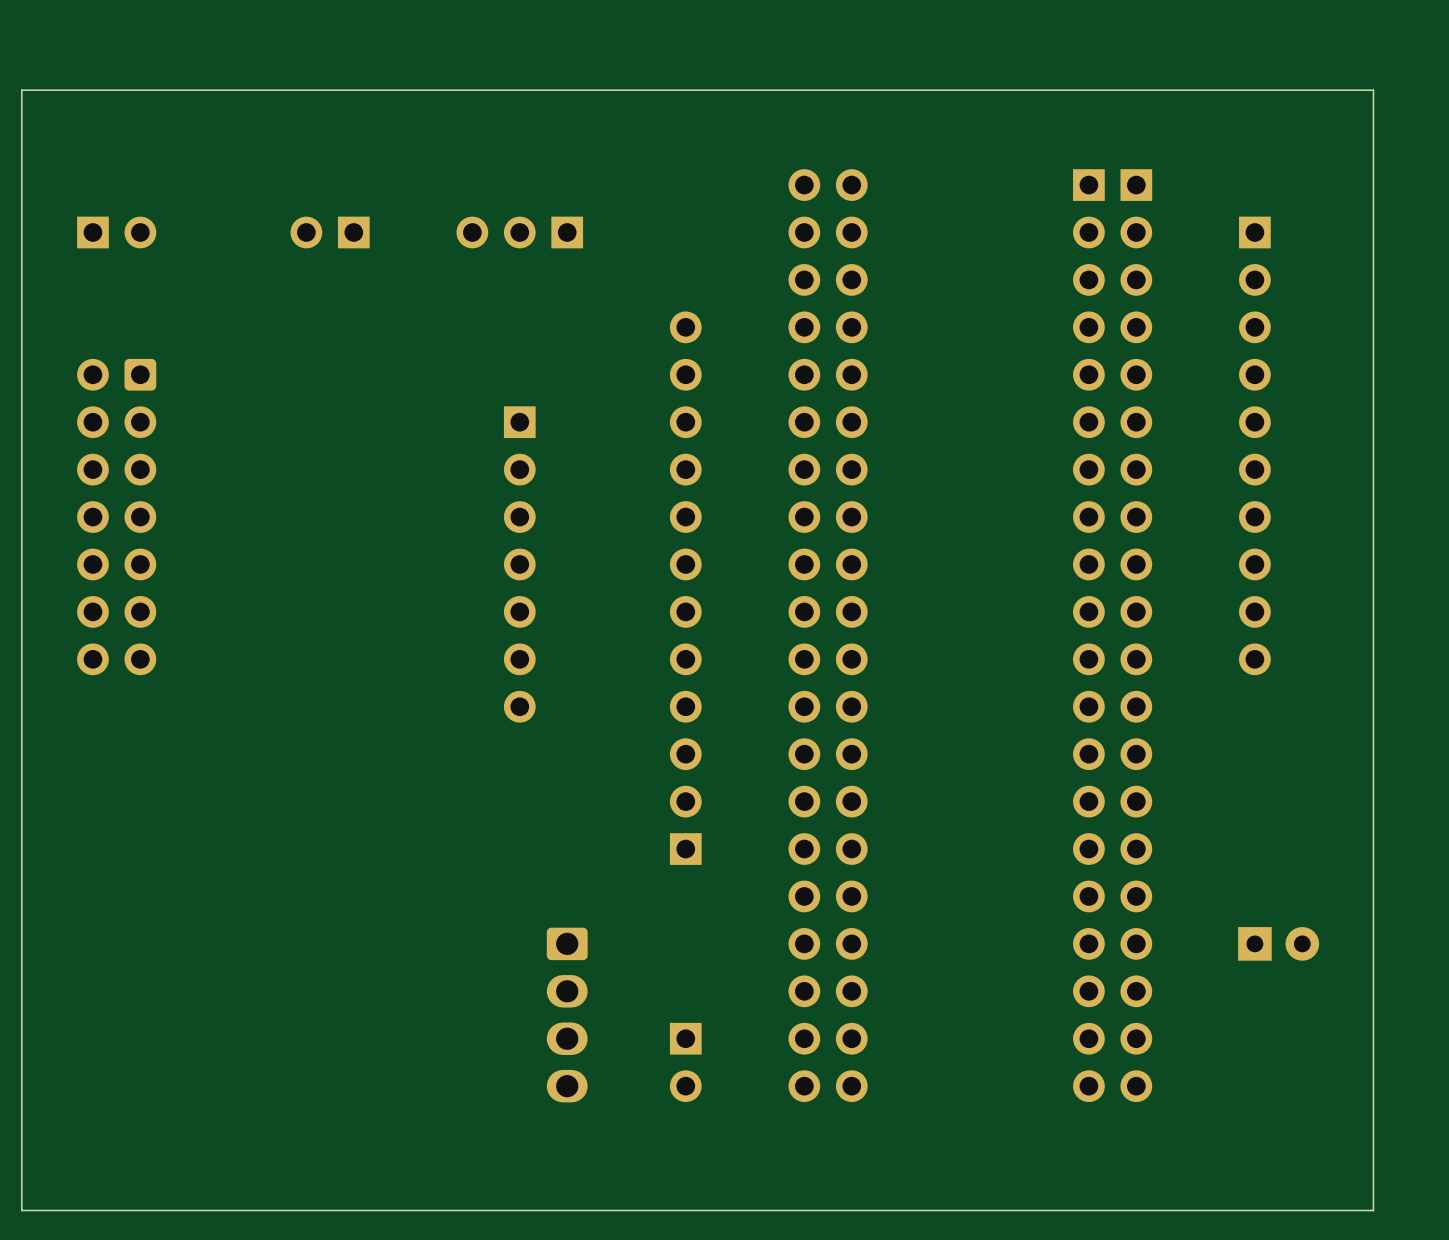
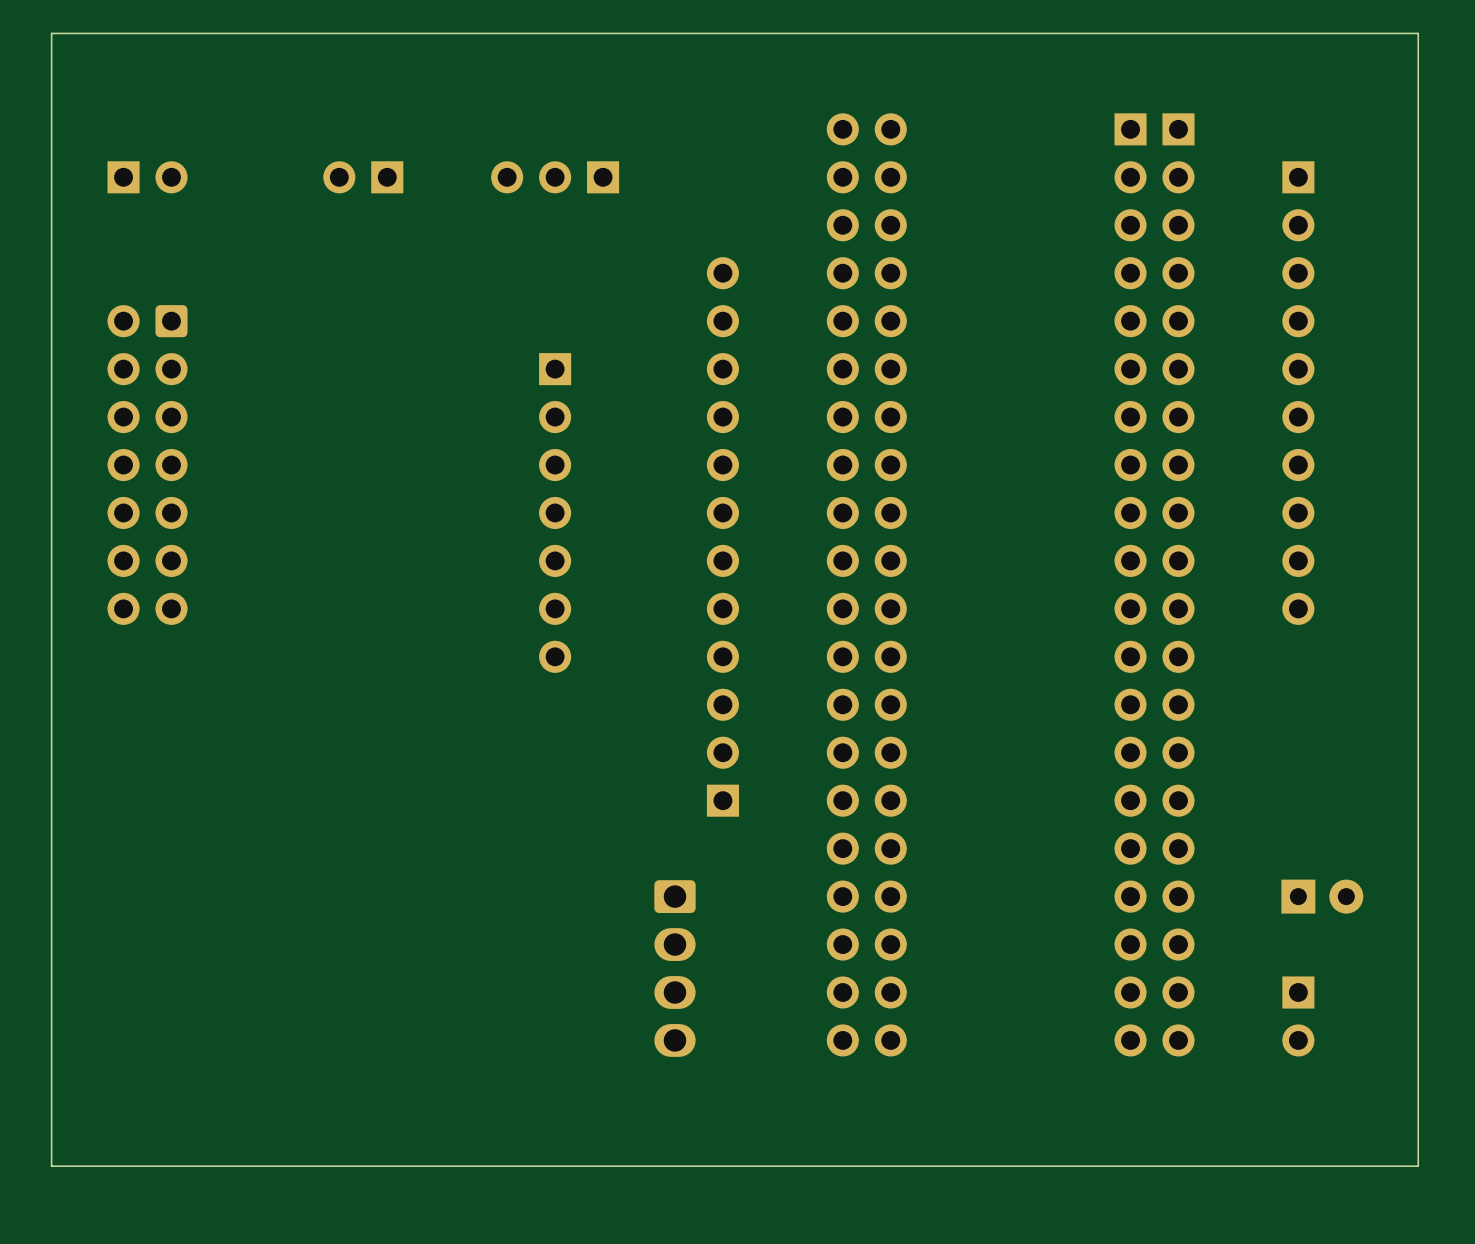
part position: (567, 1015) -> (674, 968)
part: (685, 1062) -> none
part: none -> (1298, 1016)

